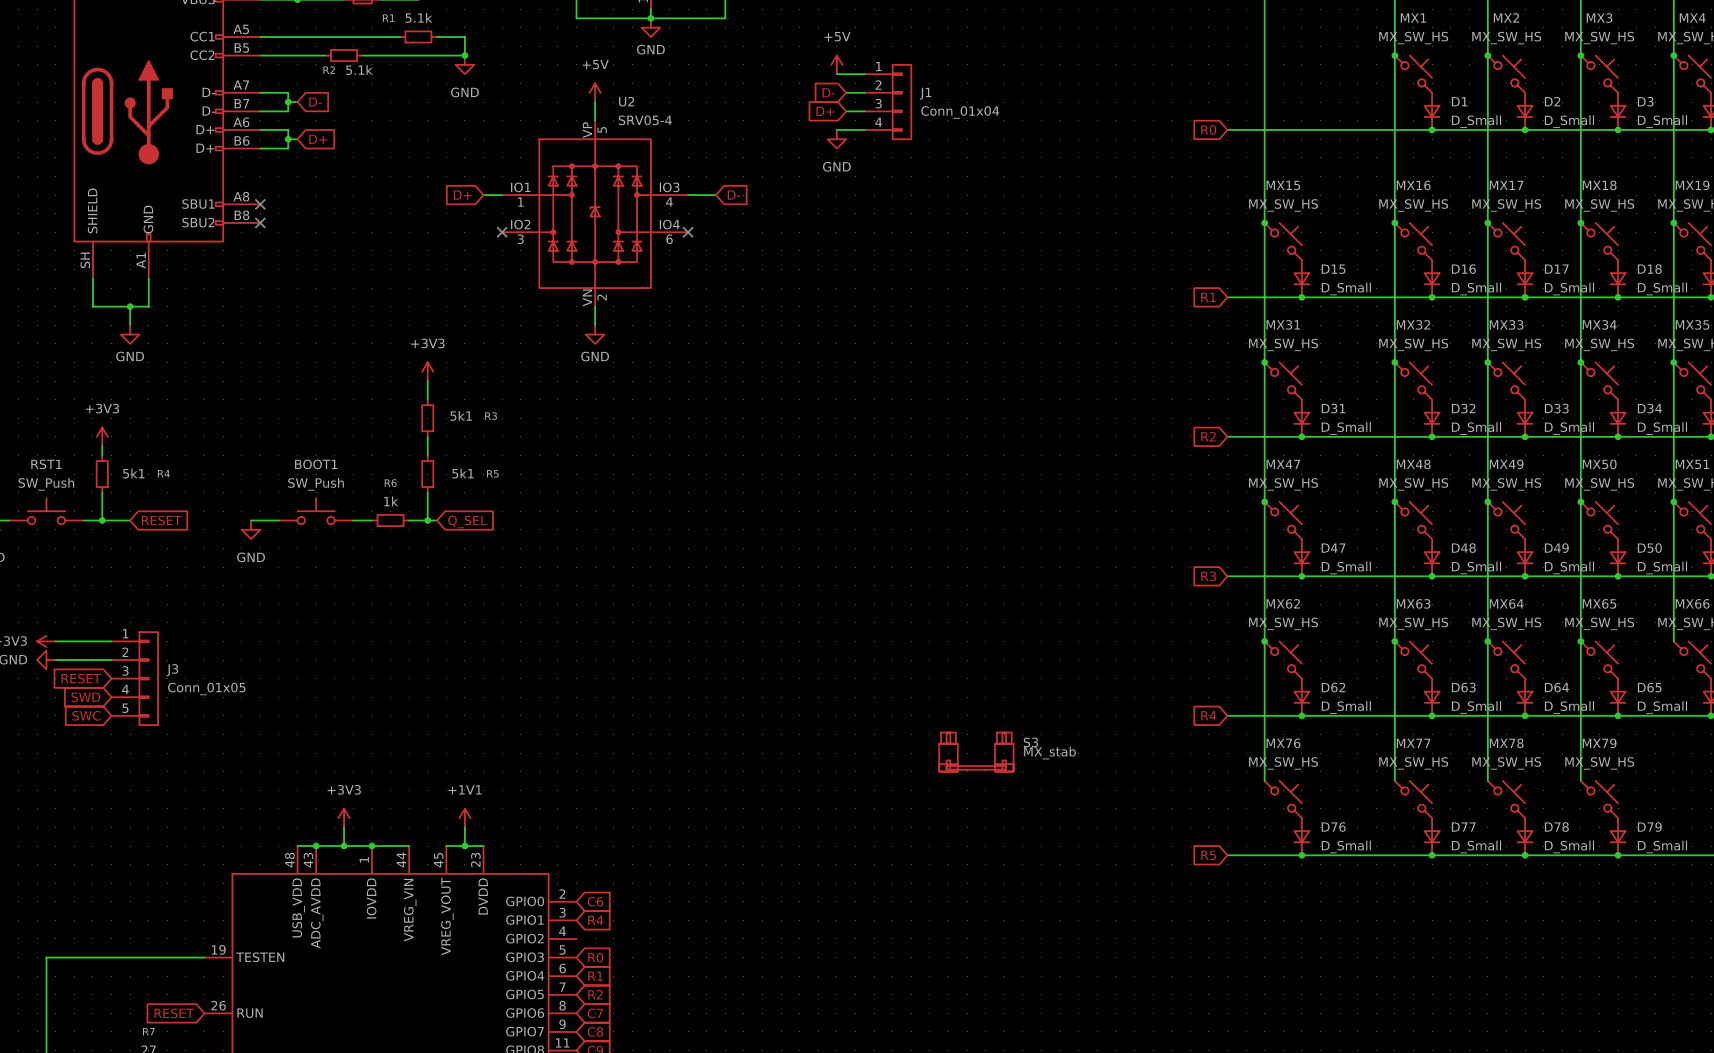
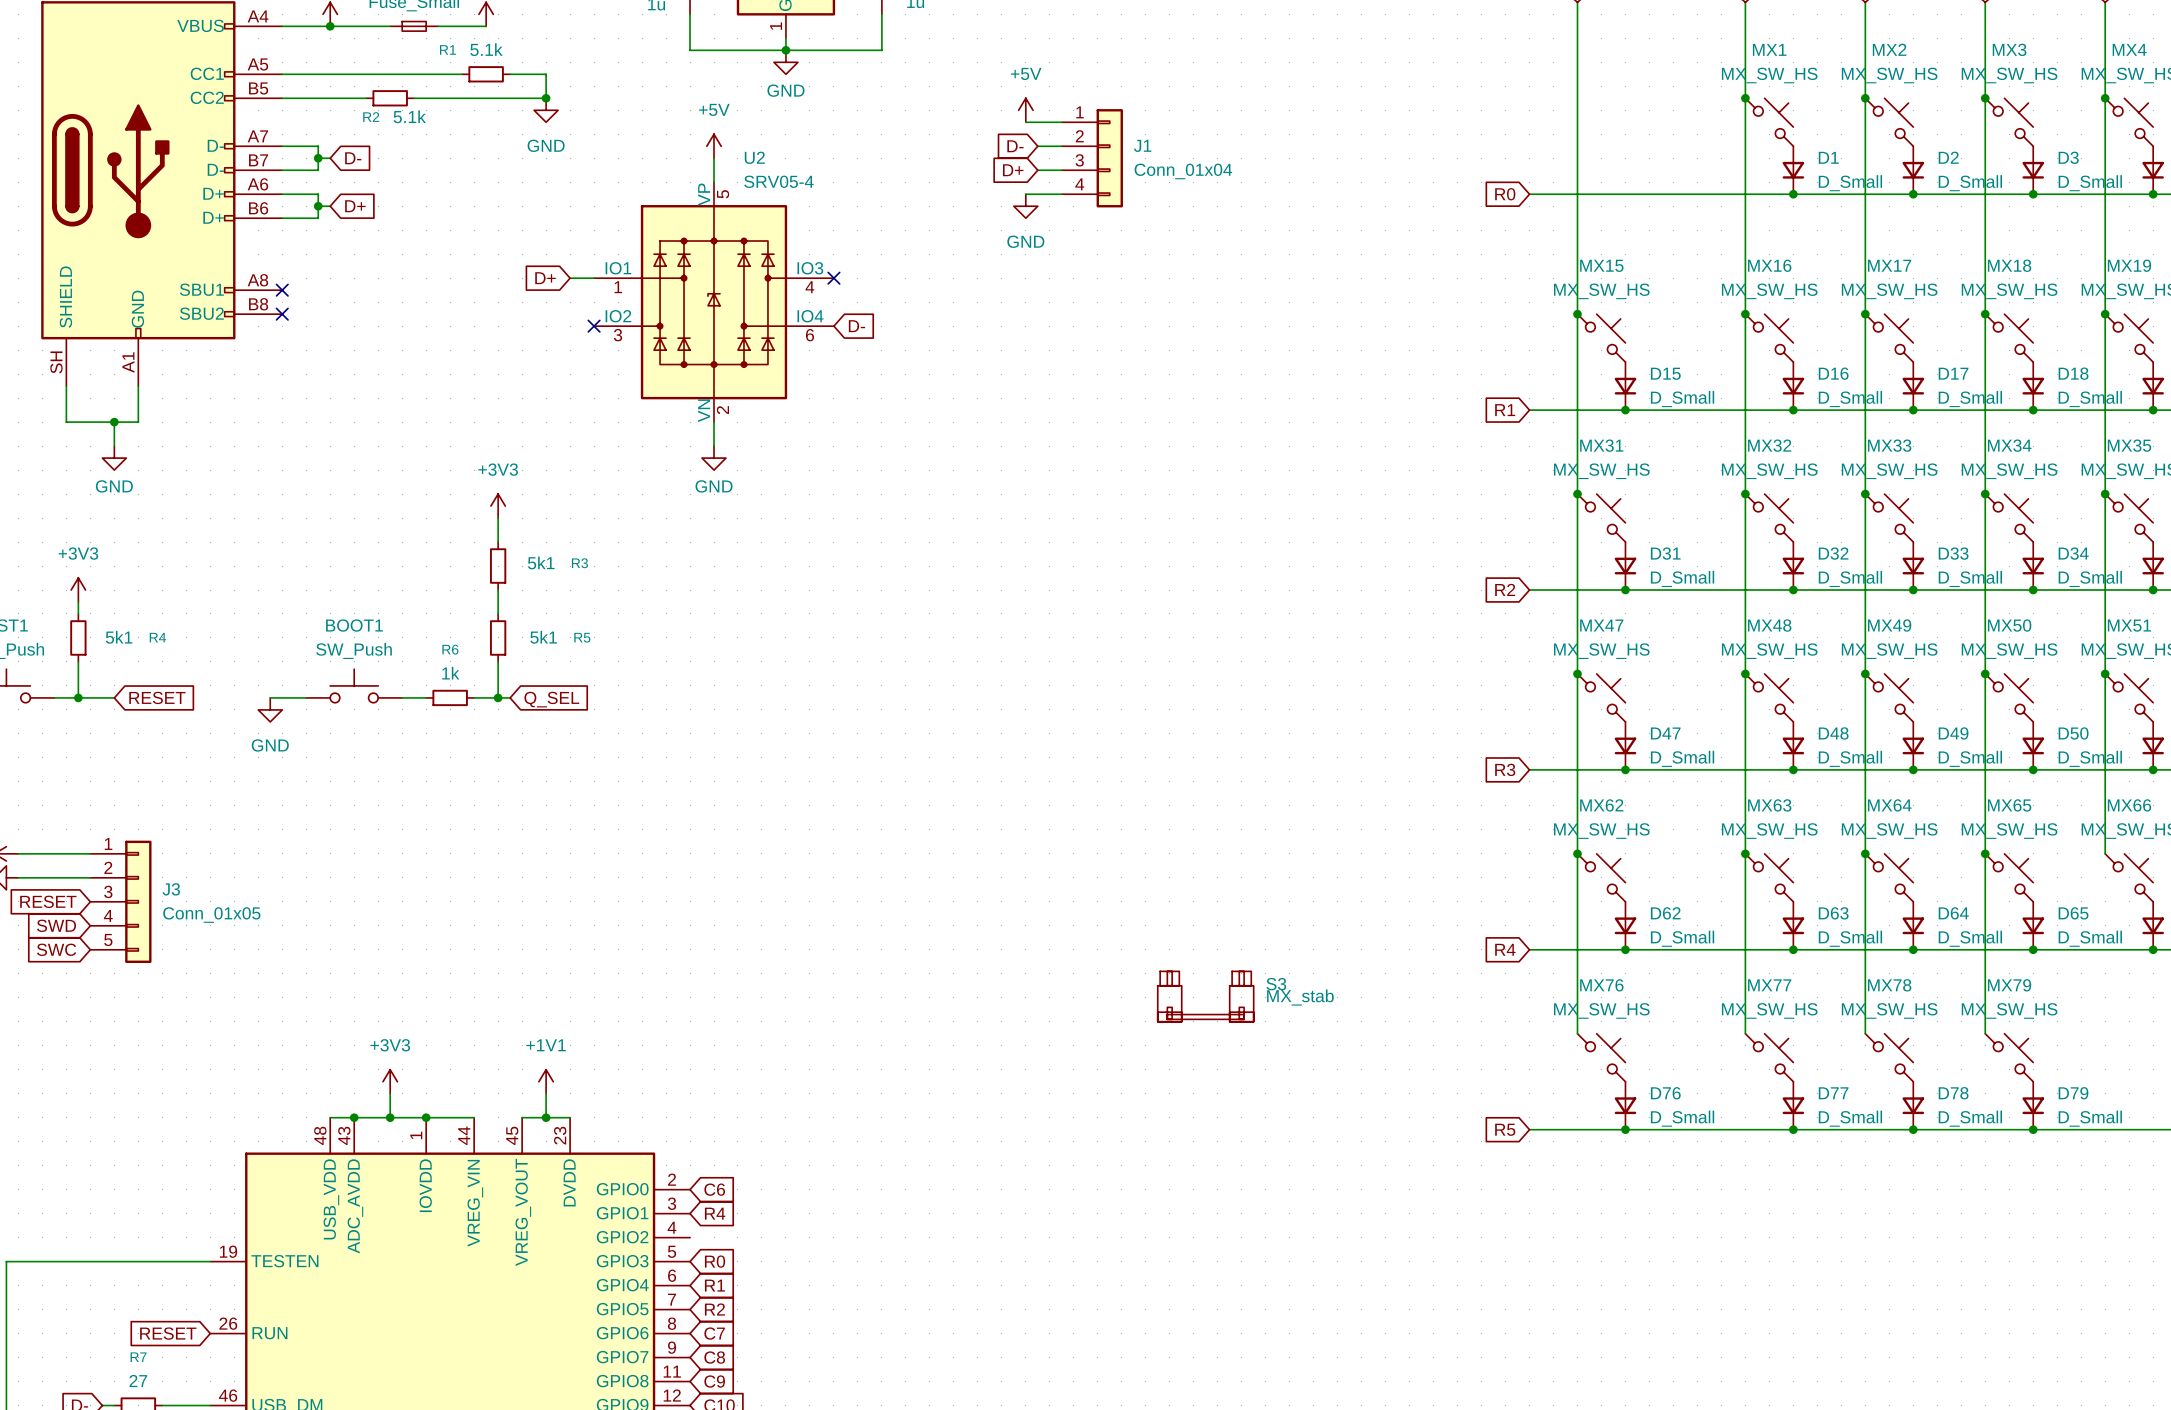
wire: (688, 195) (716, 195) -> none
global label position: D- (734, 195) -> D- (856, 326)
no-connect mark position: (688, 232) -> (833, 278)

